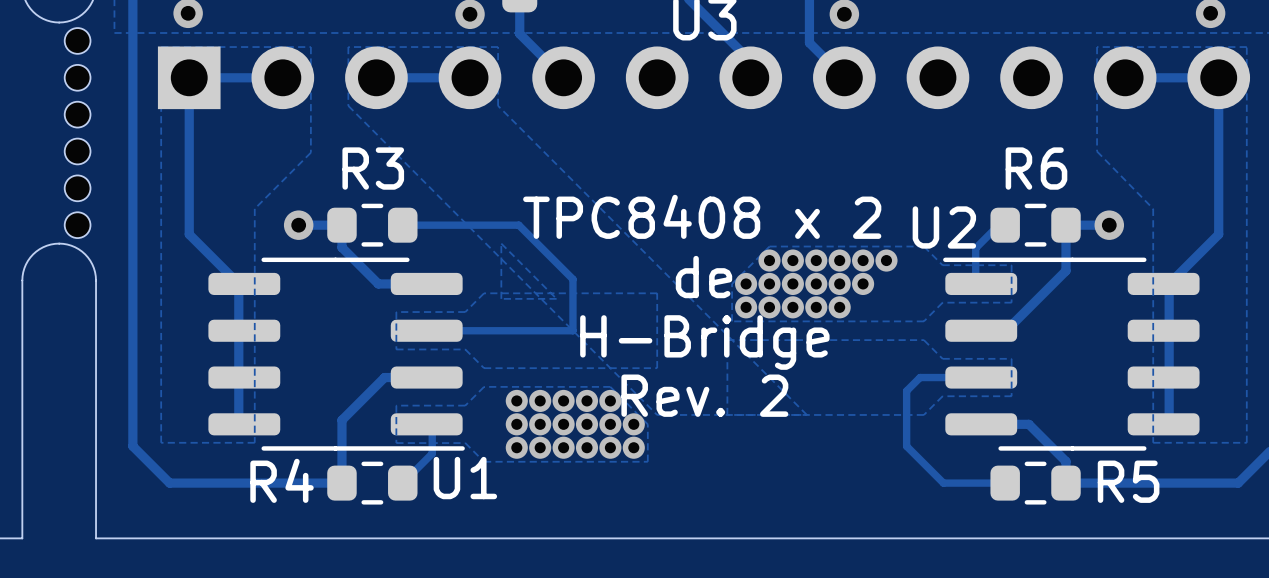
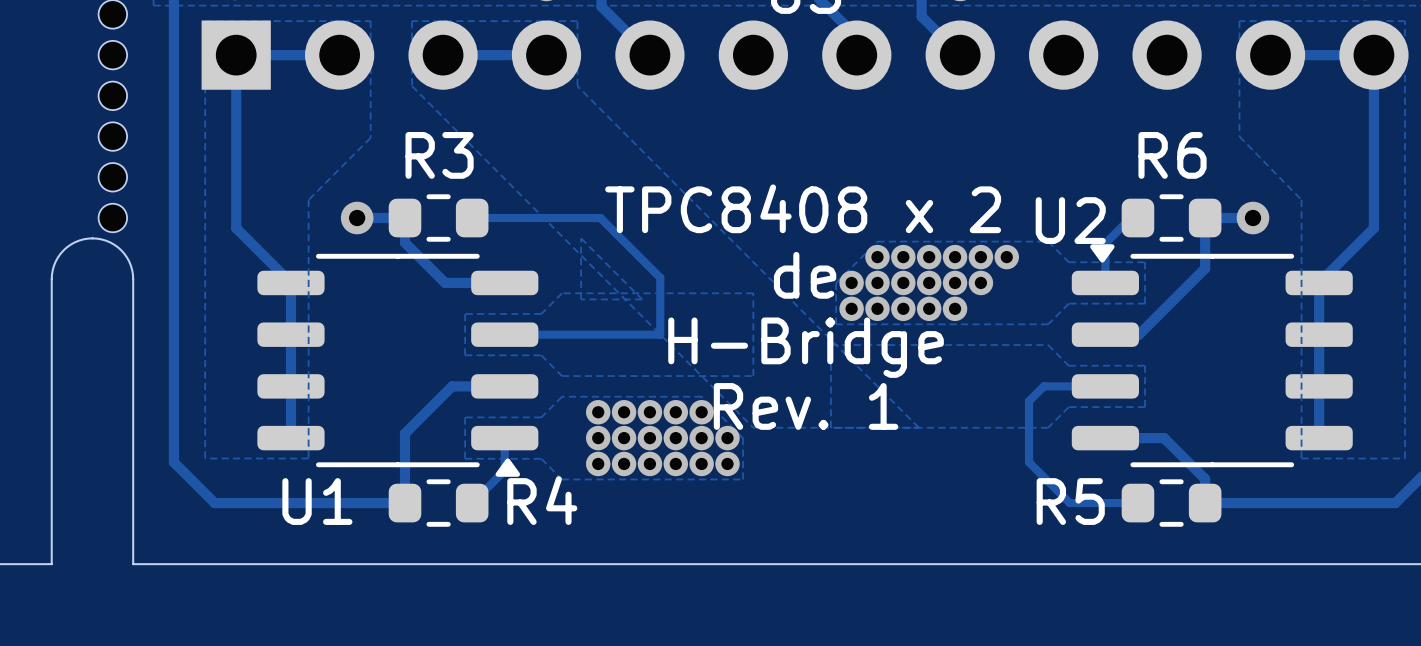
U1 footprint: [208, 257, 465, 451] -> [257, 253, 539, 477]
U2 footprint: [943, 257, 1200, 451] -> [1071, 244, 1353, 468]
text: Rev. 2 (704, 395) -> Rev. 1 (806, 406)
U1 name position: U1 (465, 478) -> U1 (317, 501)
R4 name position: R4 (282, 480) -> R4 (542, 500)
R5 name position: R5 (1128, 481) -> R5 (1070, 501)

